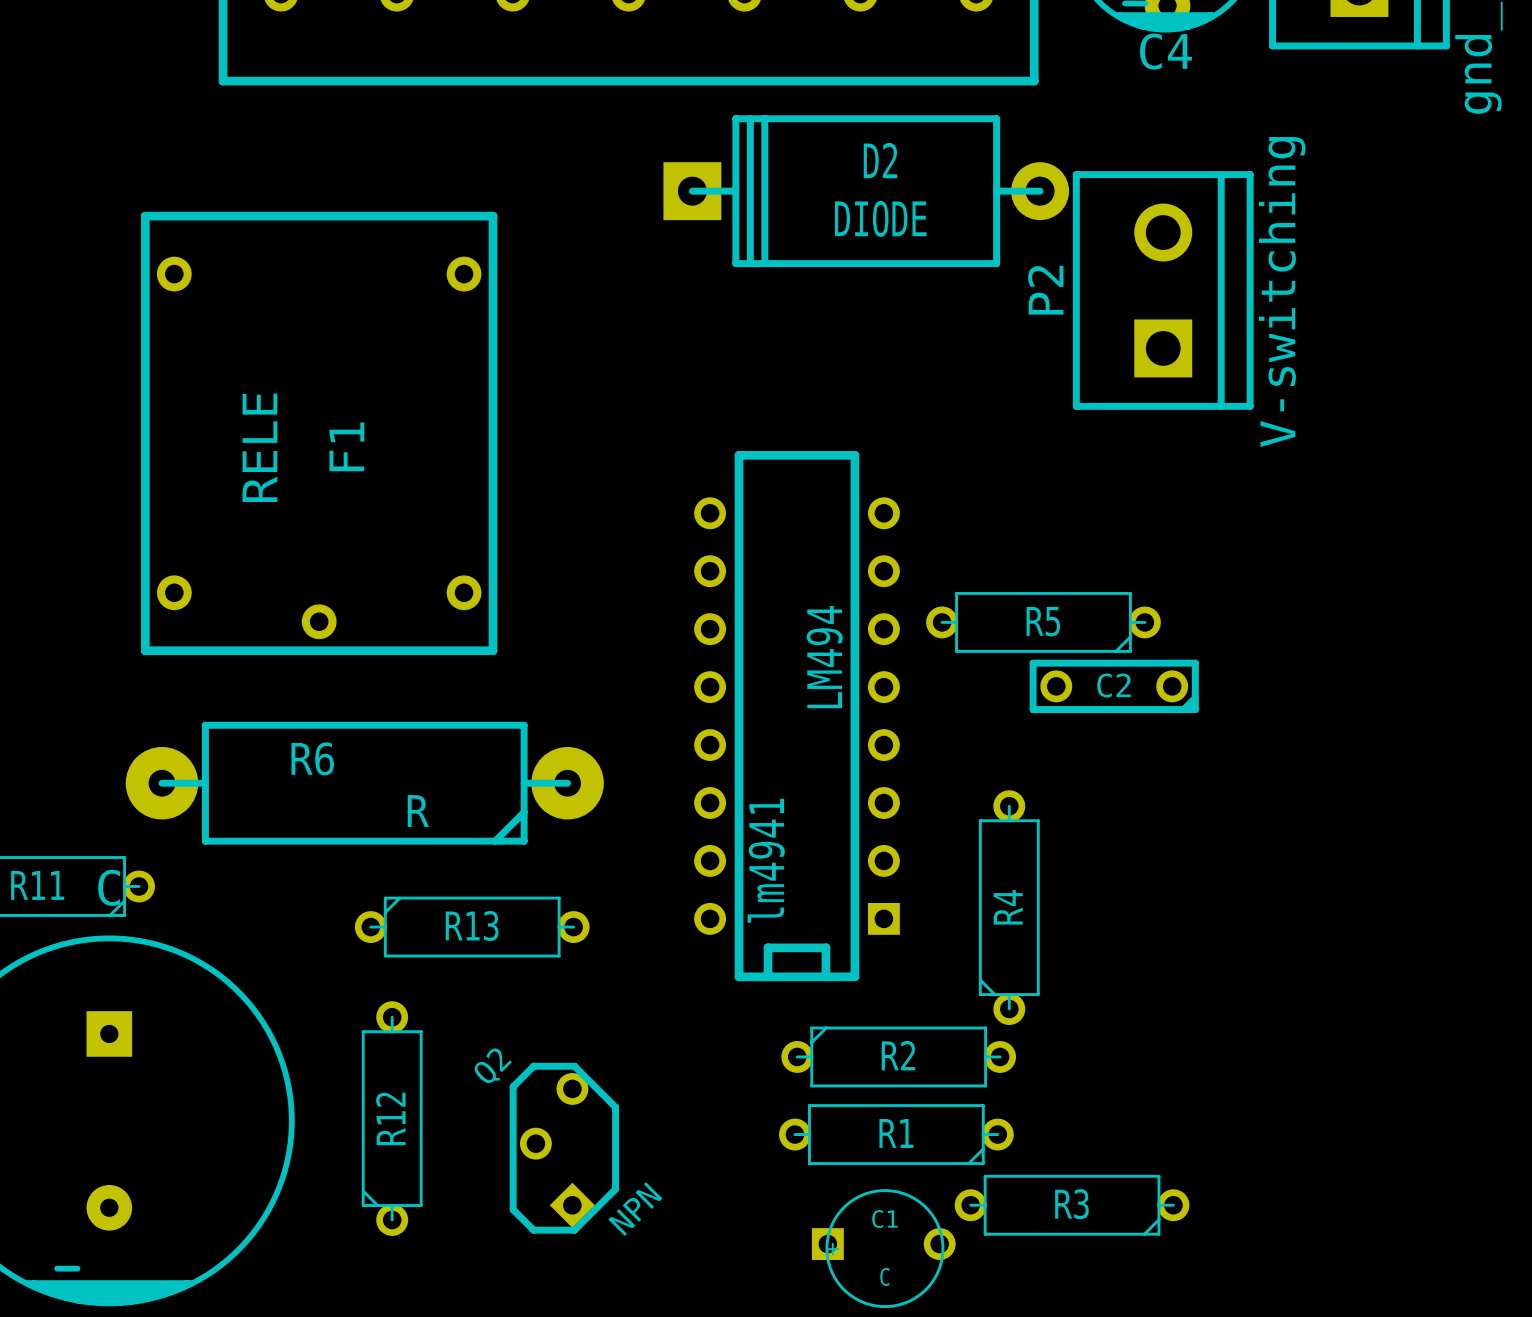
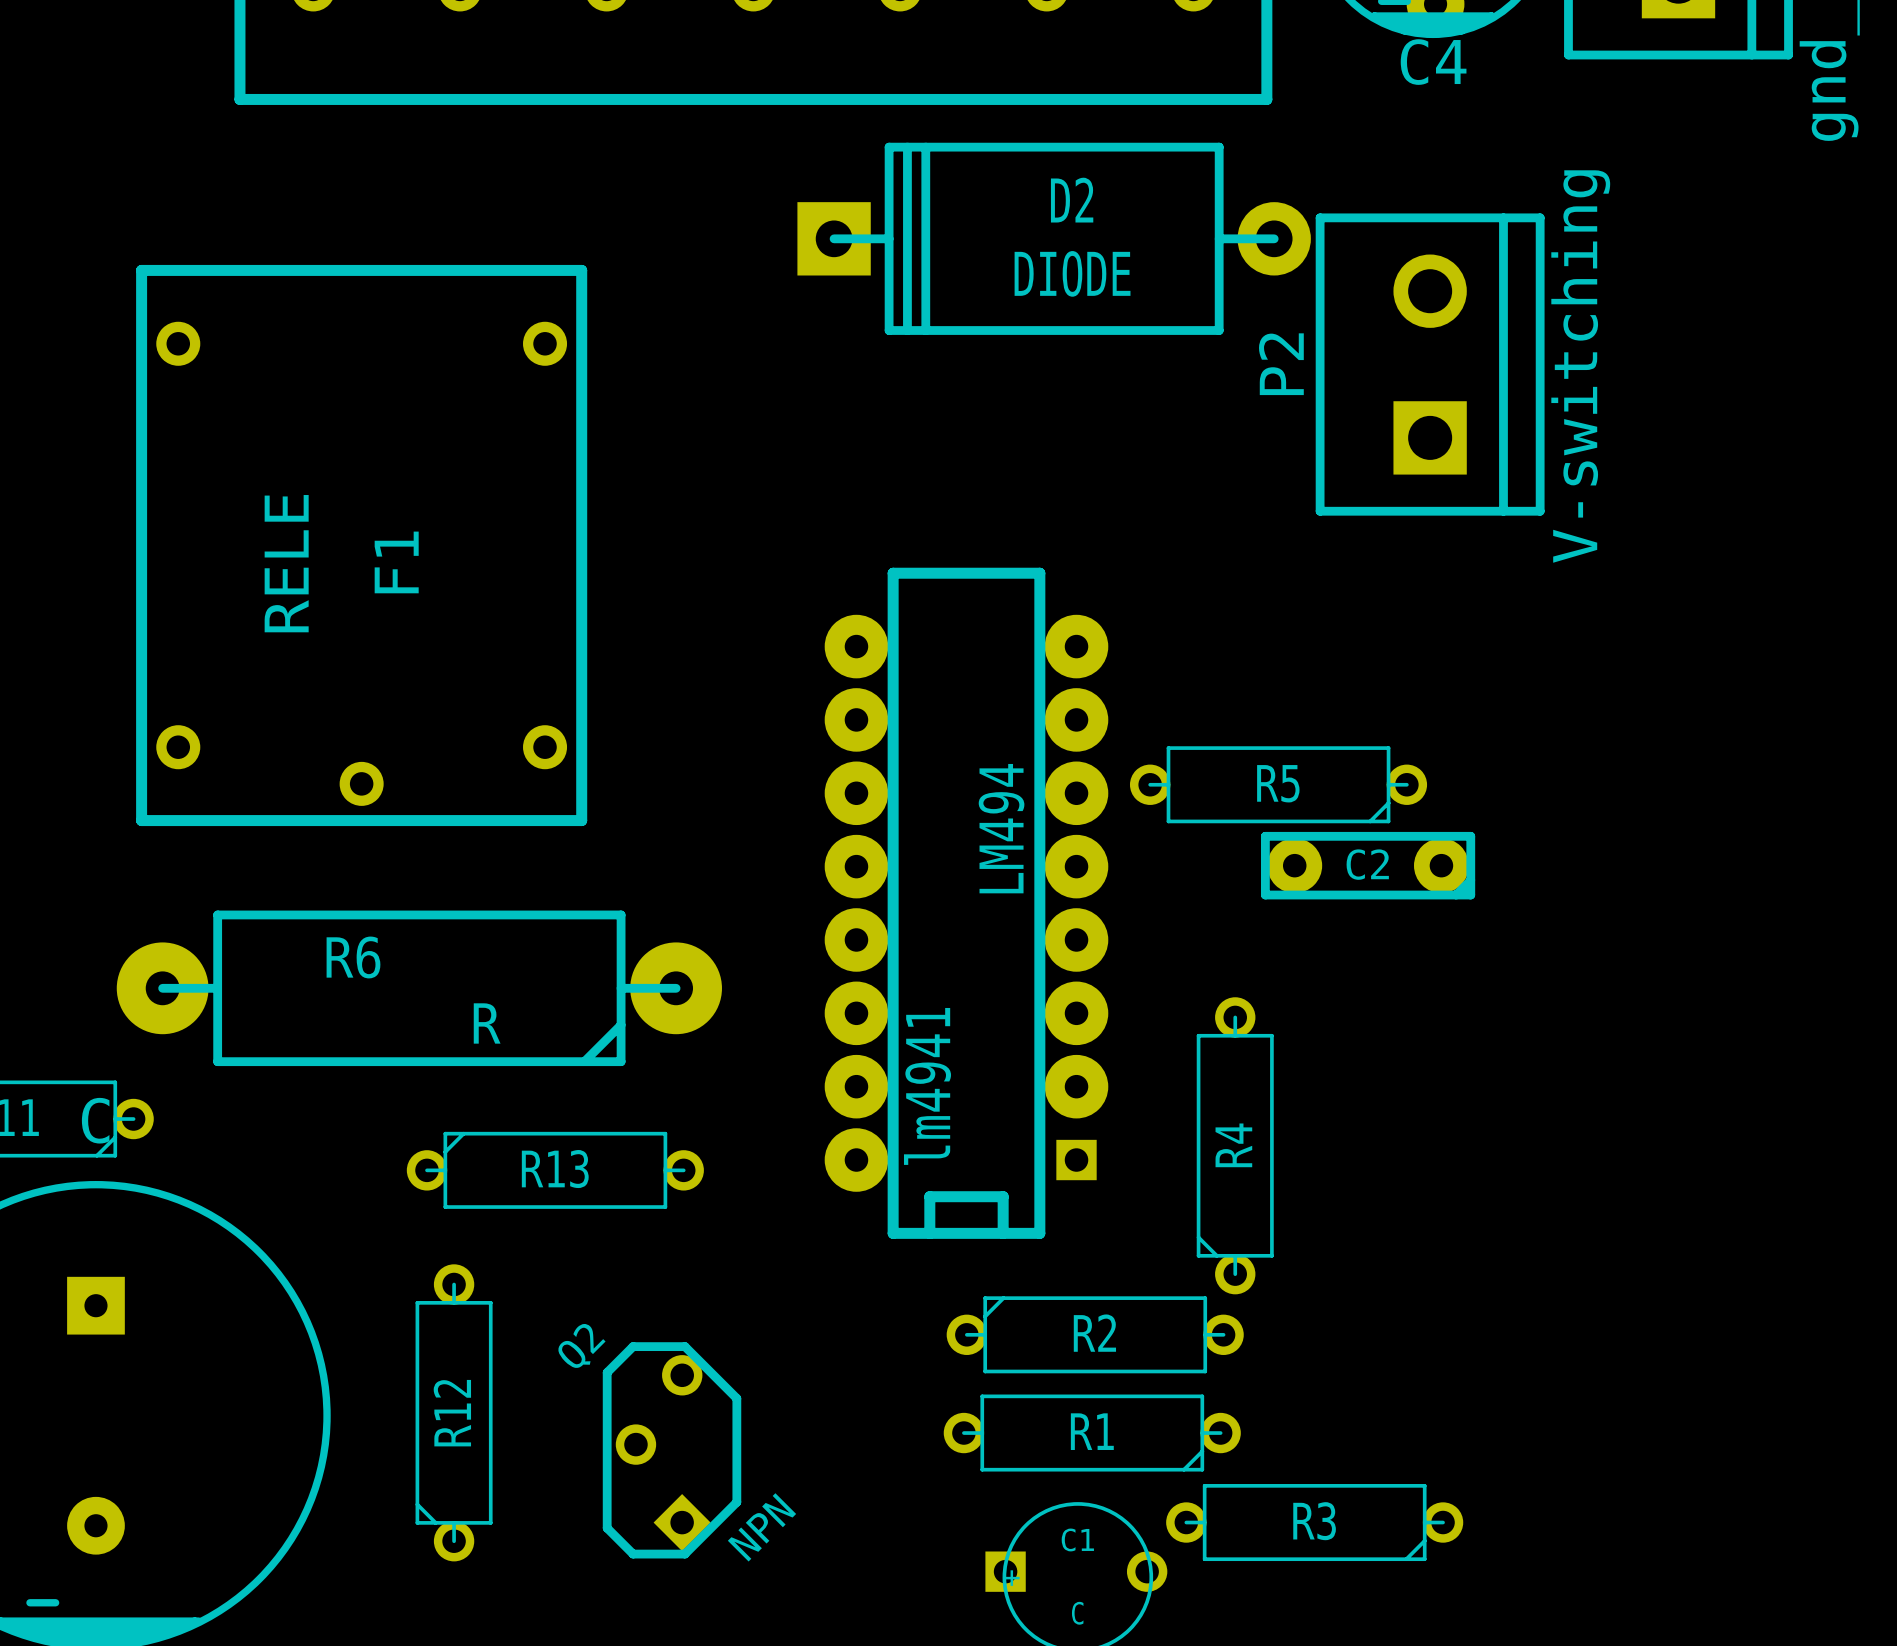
lm4941 footprint: [694, 450, 900, 982] -> [824, 567, 1109, 1239]
C2 footprint: [1029, 659, 1199, 714] -> [1260, 831, 1476, 900]

